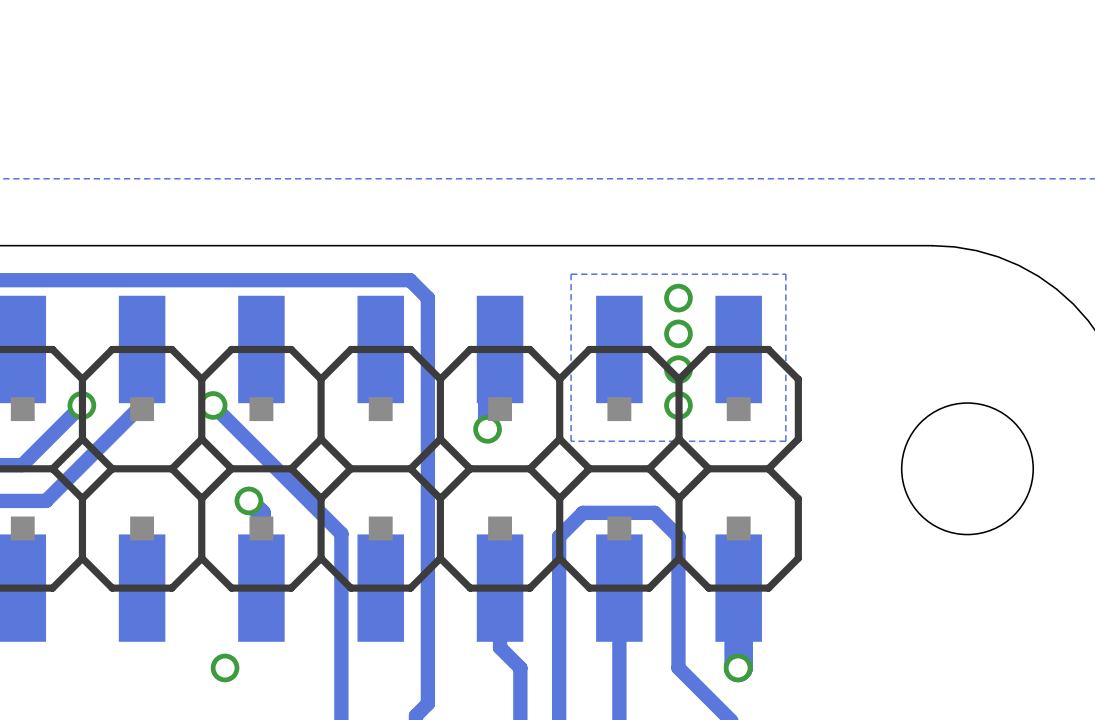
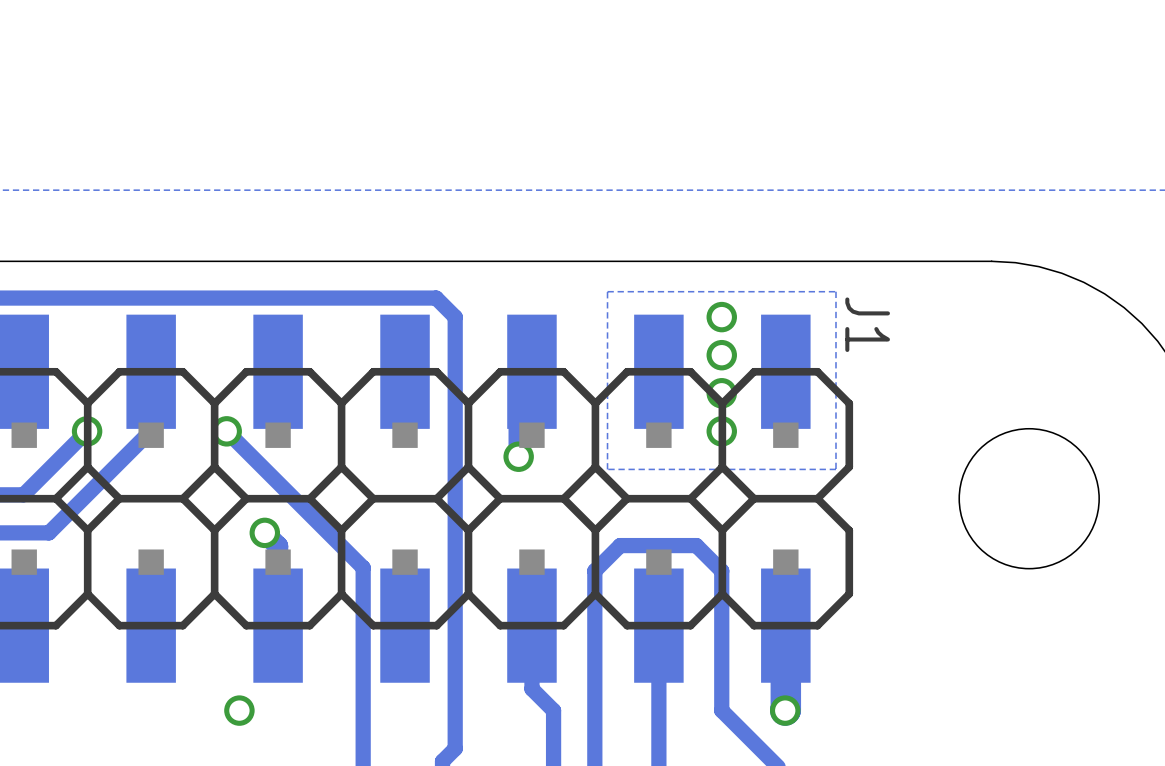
J1 name: none -> J1 (867, 324)

